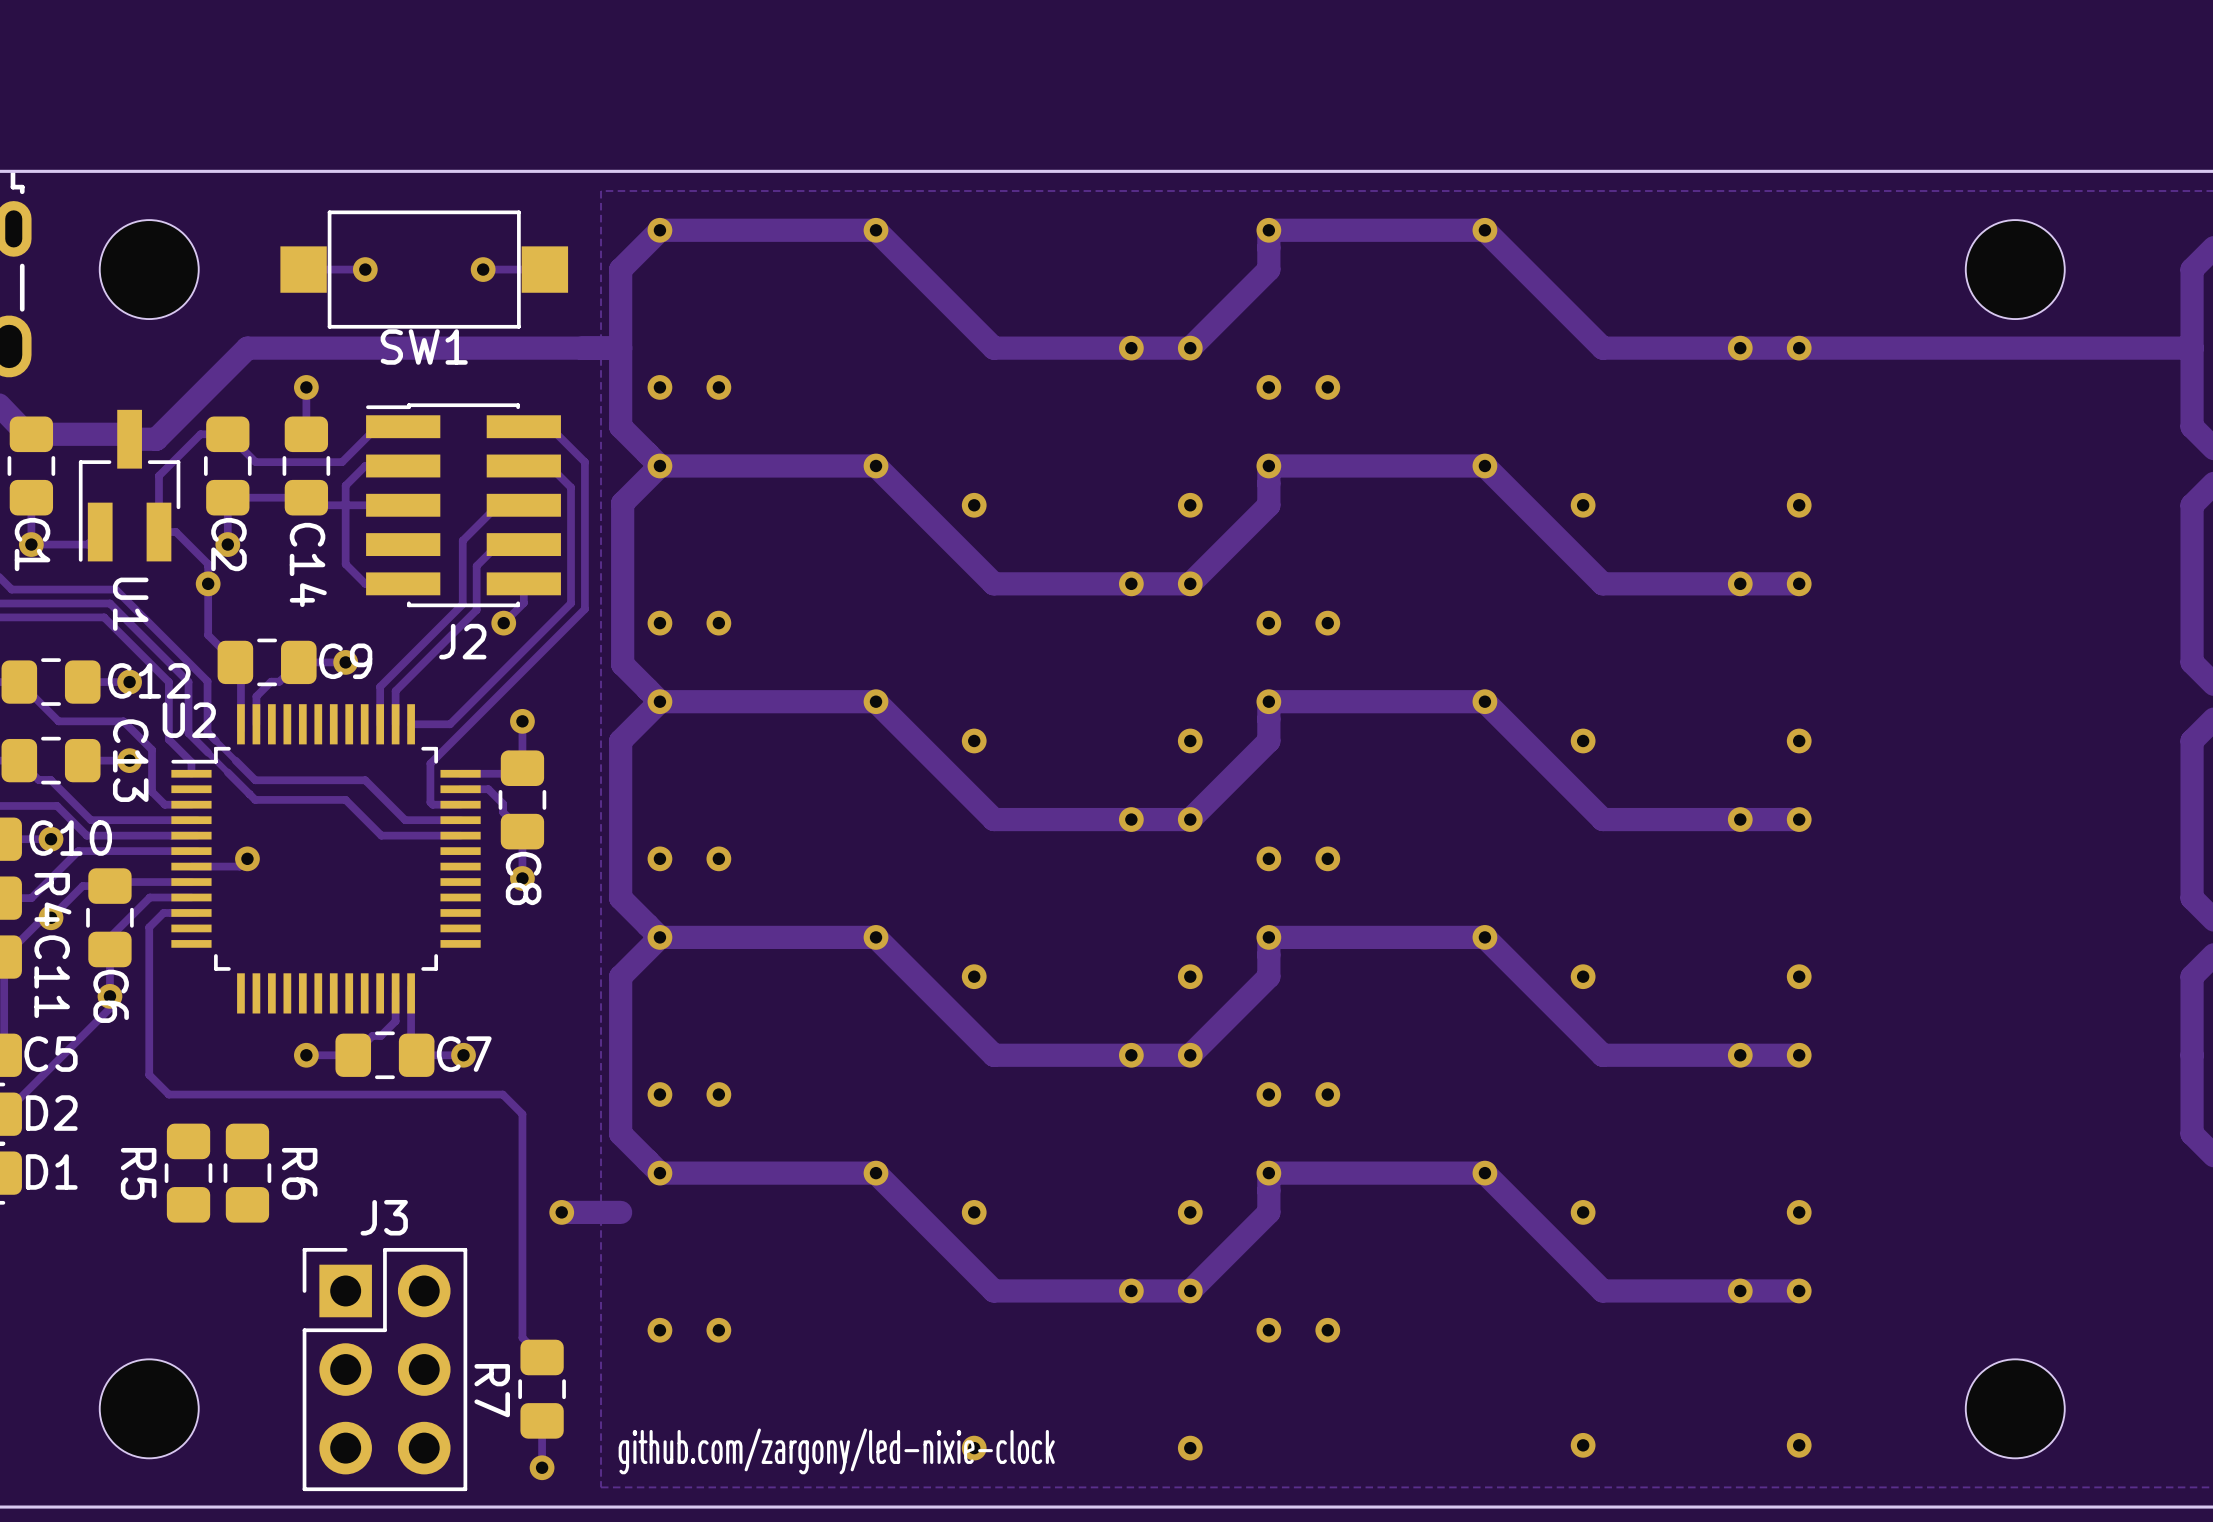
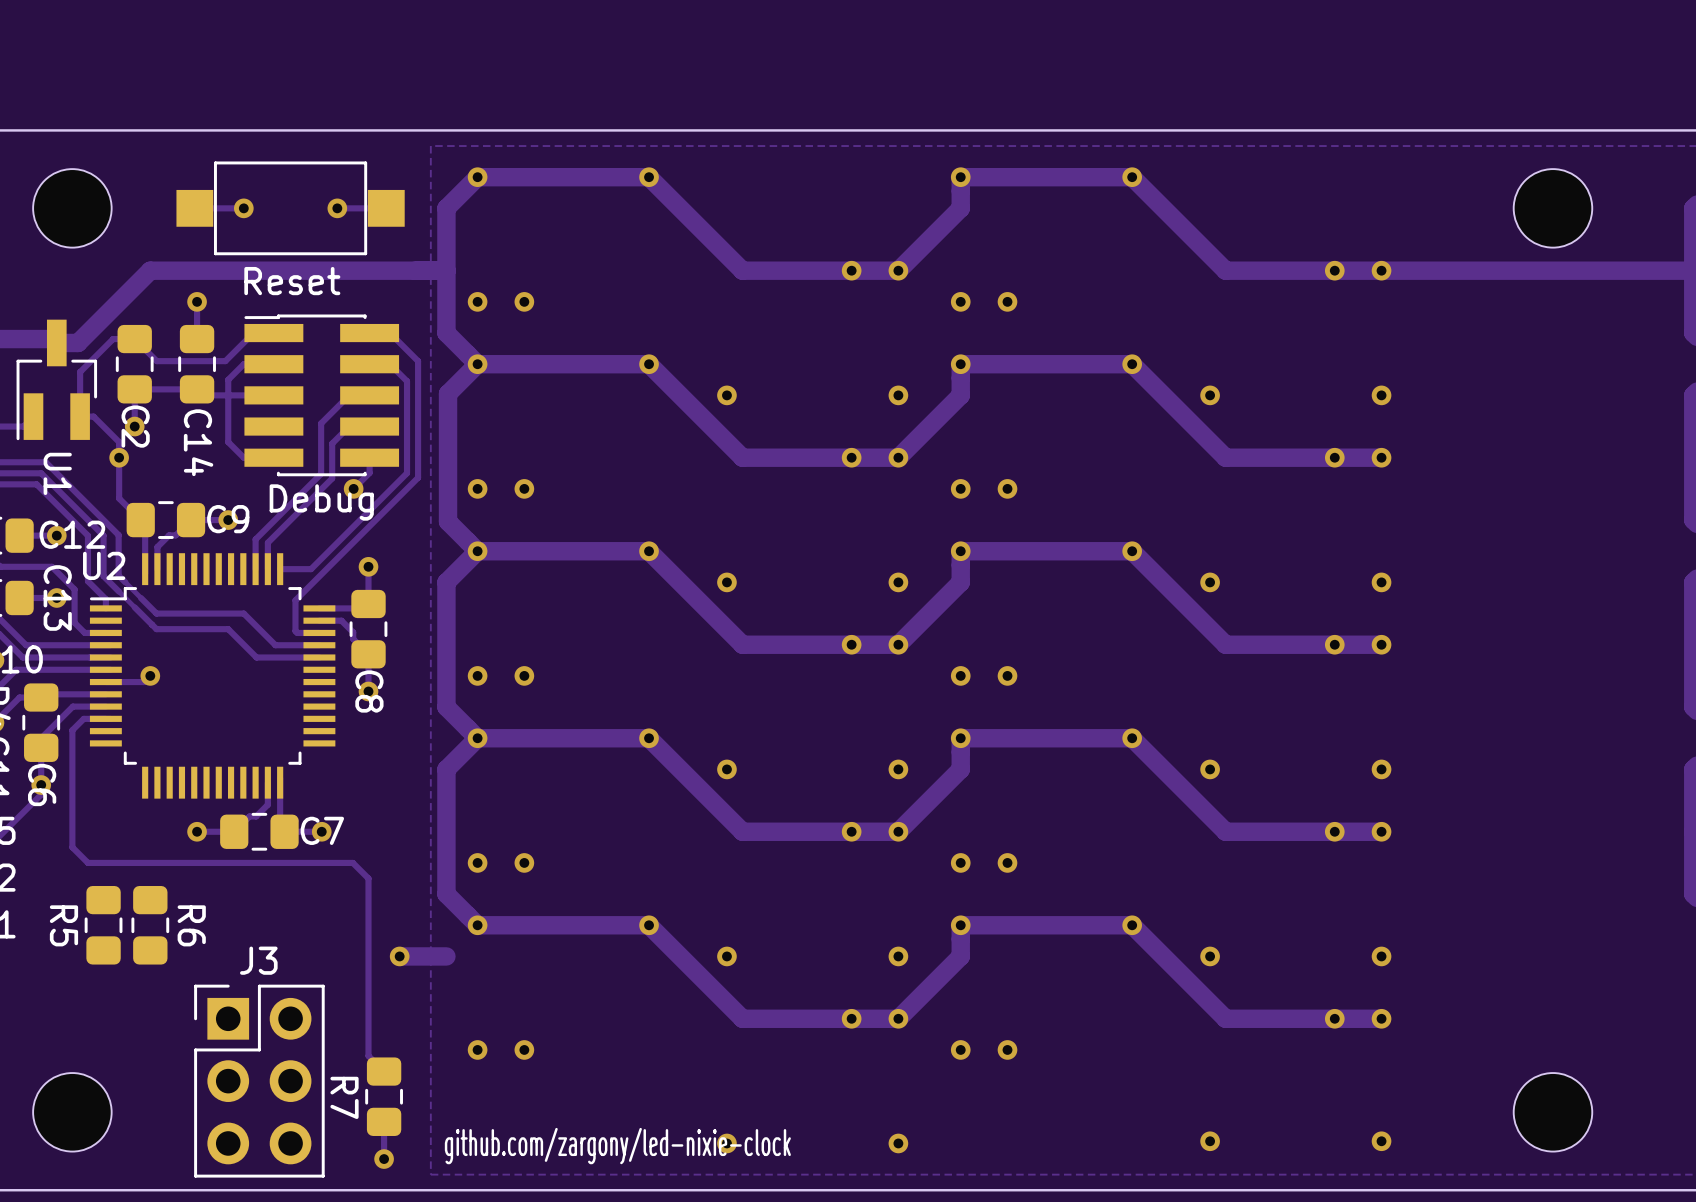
SW1 name: SW1 (424, 346) -> none
SW1 value: none -> Reset (292, 281)
J2 value: none -> Debug (321, 502)
J2 name: J2 (462, 641) -> none

